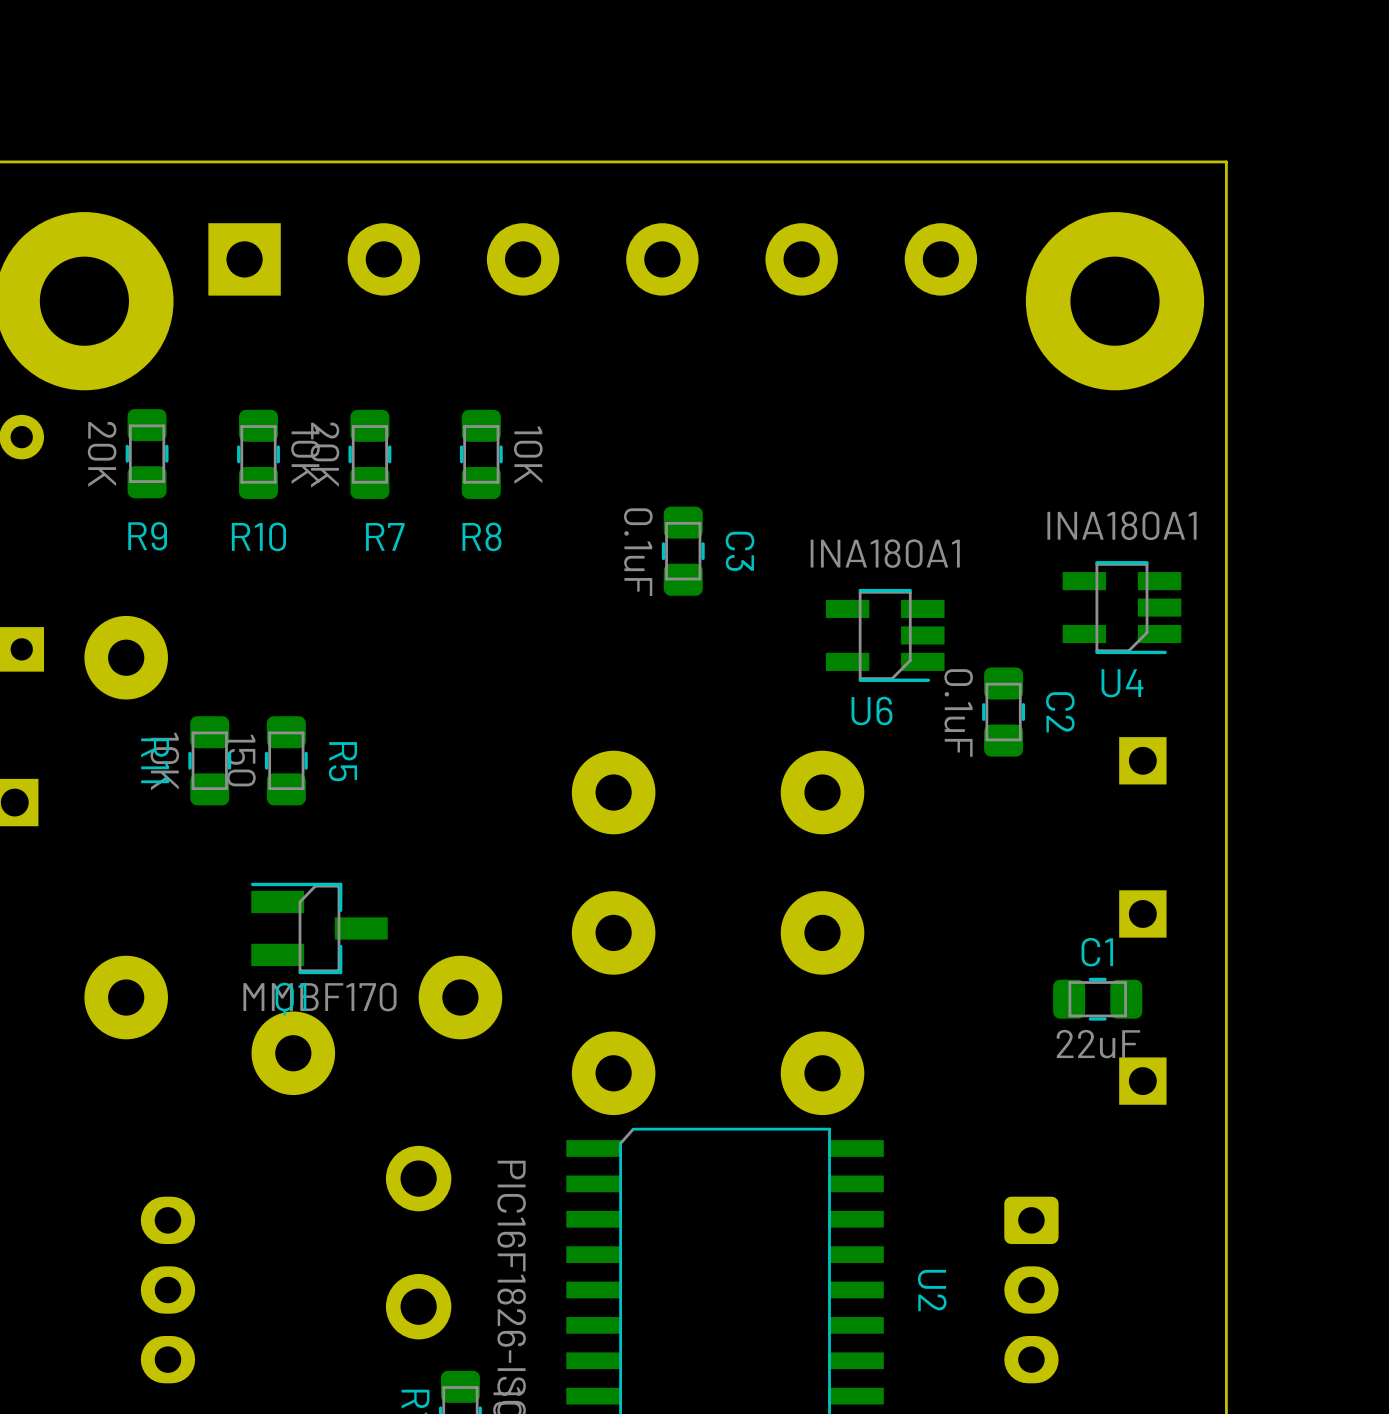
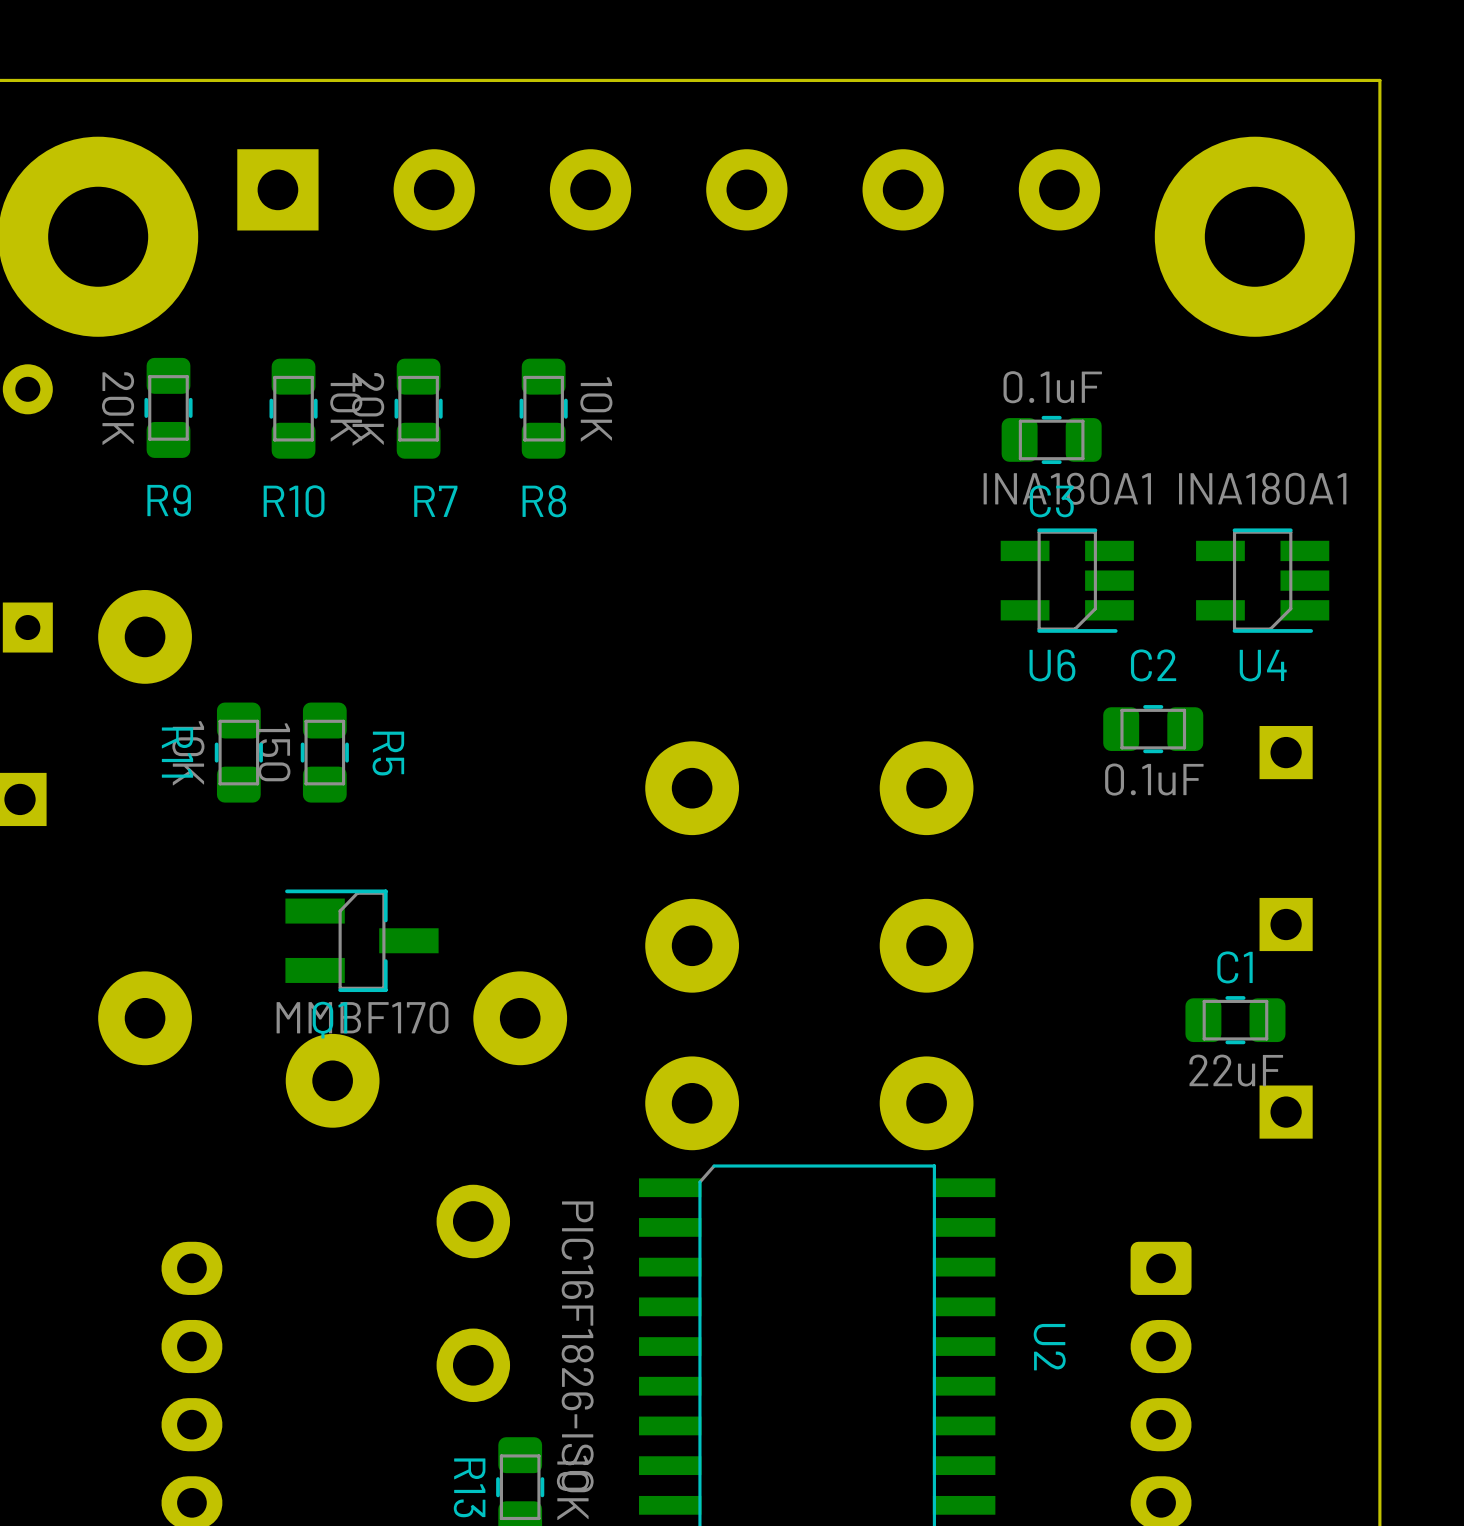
C3 rotation: 0° (683, 551) -> 90° clockwise (1051, 439)
C3 position: (683, 551) -> (1051, 439)
U6 position: (885, 635) -> (1067, 580)
C2 rotation: 0° (1003, 712) -> 90° clockwise (1153, 729)
C2 name position: C2 (1060, 712) -> C2 (1153, 665)
C2 value position: 0.1uF (958, 713) -> 0.1uF (1154, 779)

